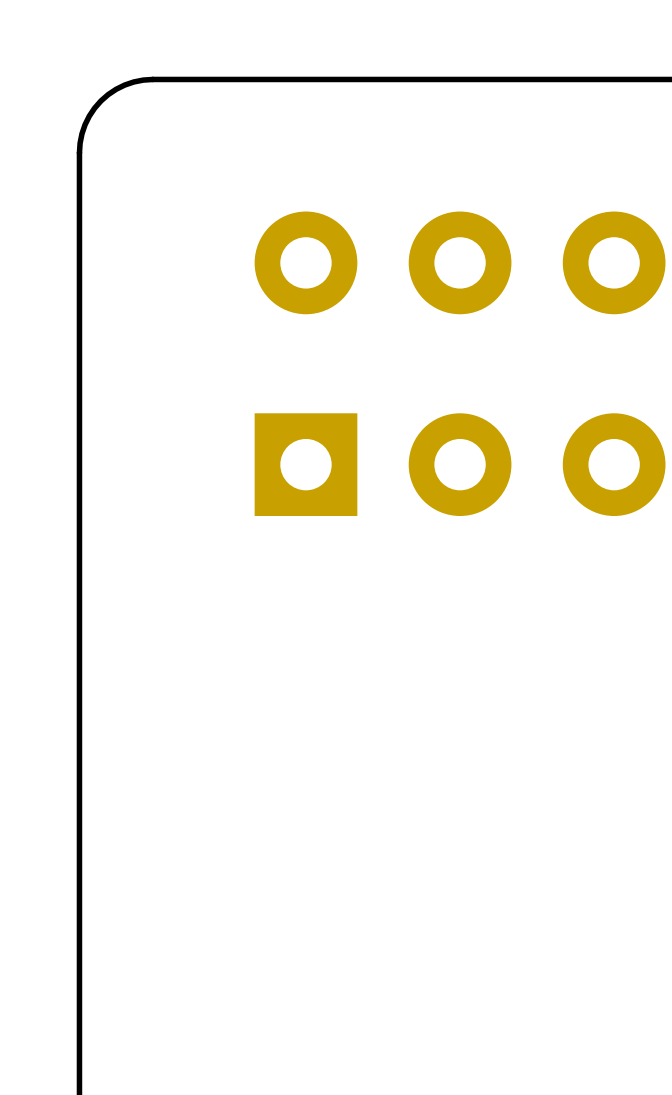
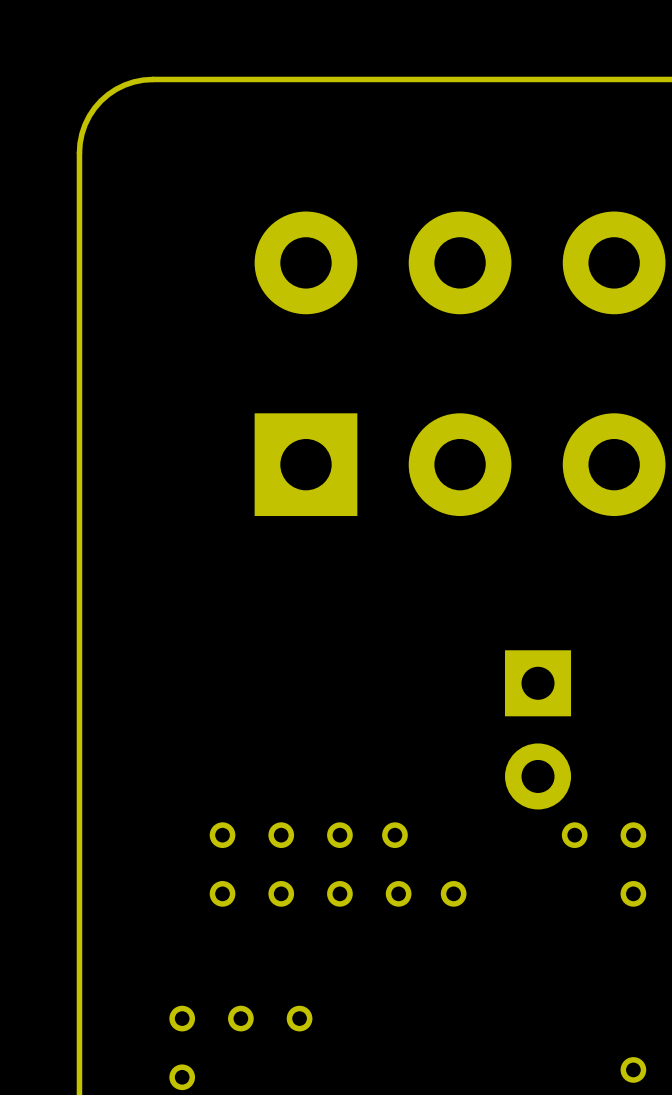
part: none -> (538, 729)
part: none -> (222, 835)
part: none -> (281, 835)
part: none -> (339, 835)
part: none -> (394, 835)
part: none -> (574, 835)
part: none -> (633, 835)
part: none -> (222, 893)
part: none -> (281, 893)
part: none -> (339, 893)
part: none -> (398, 893)
part: none -> (453, 893)
part: none -> (633, 893)
part: none -> (182, 1018)
part: none -> (240, 1018)
part: none -> (299, 1018)
part: none -> (633, 1069)
part: none -> (182, 1077)

